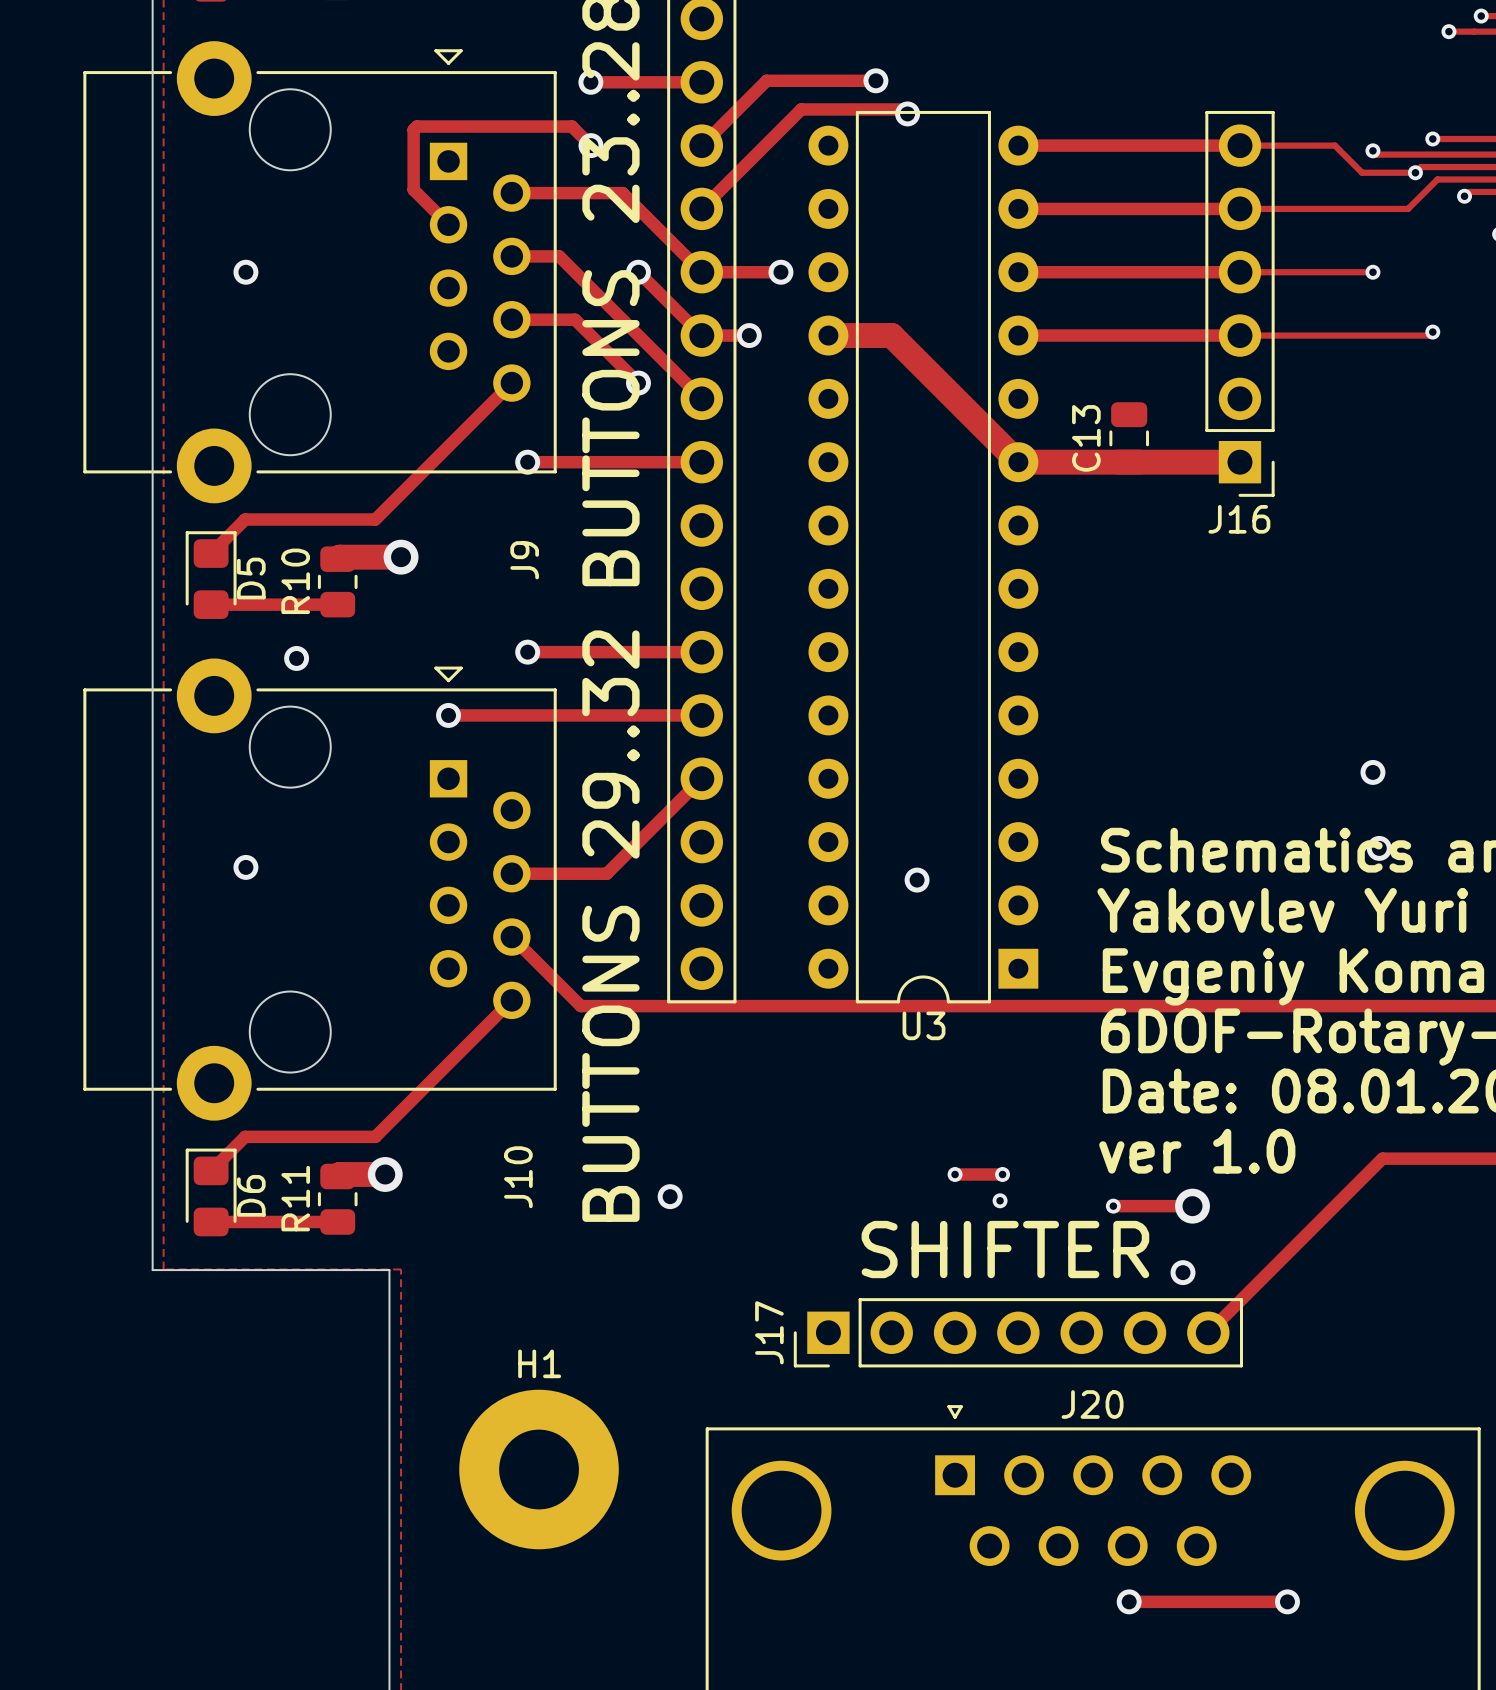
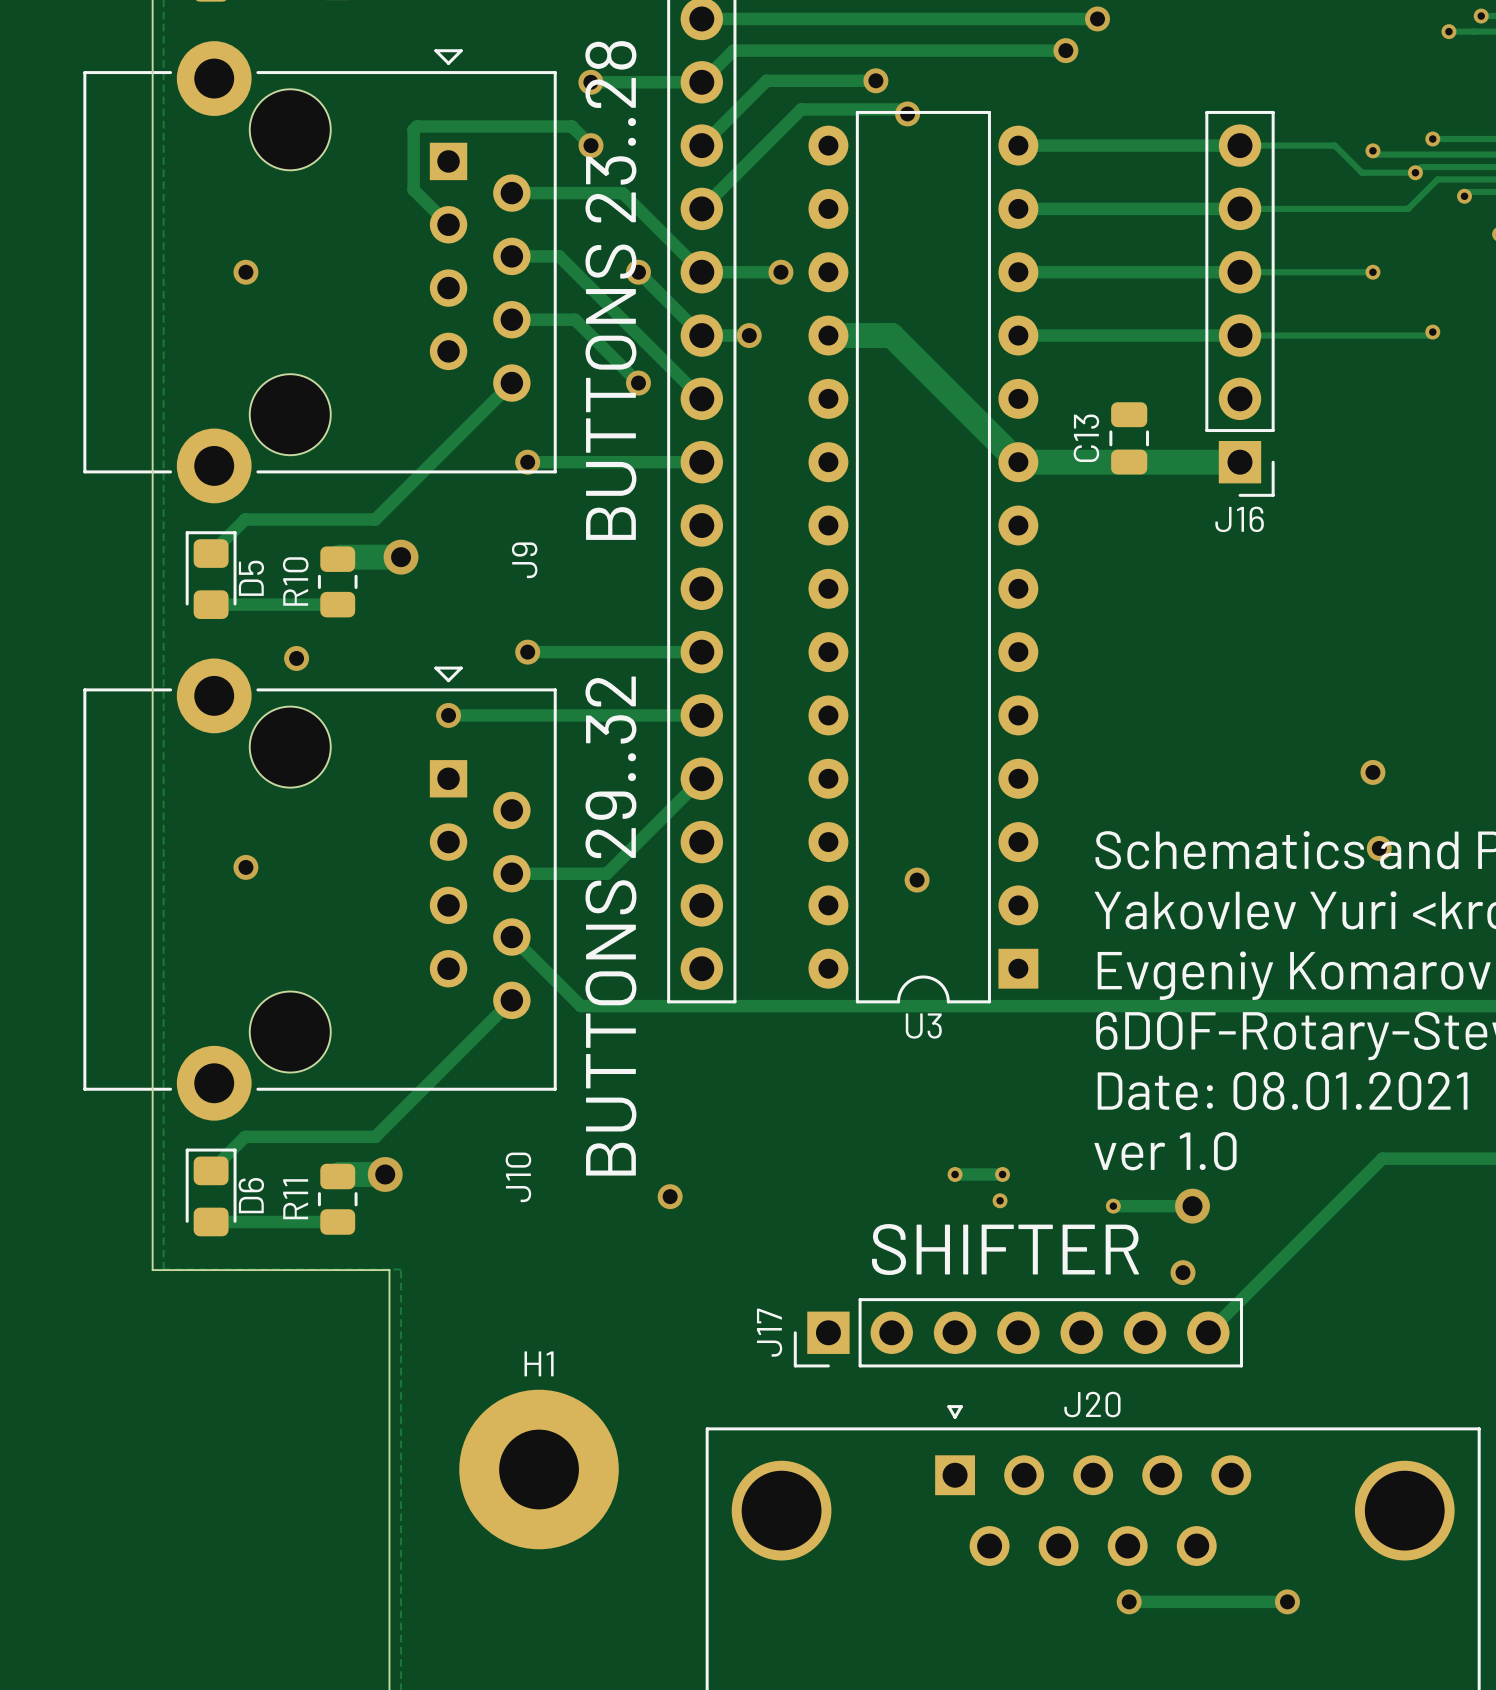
track: none -> (701, 18) (1097, 18)
via: none -> (1097, 18)
track: none -> (1065, 50) (733, 50) (701, 82)
via: none -> (1065, 50)

